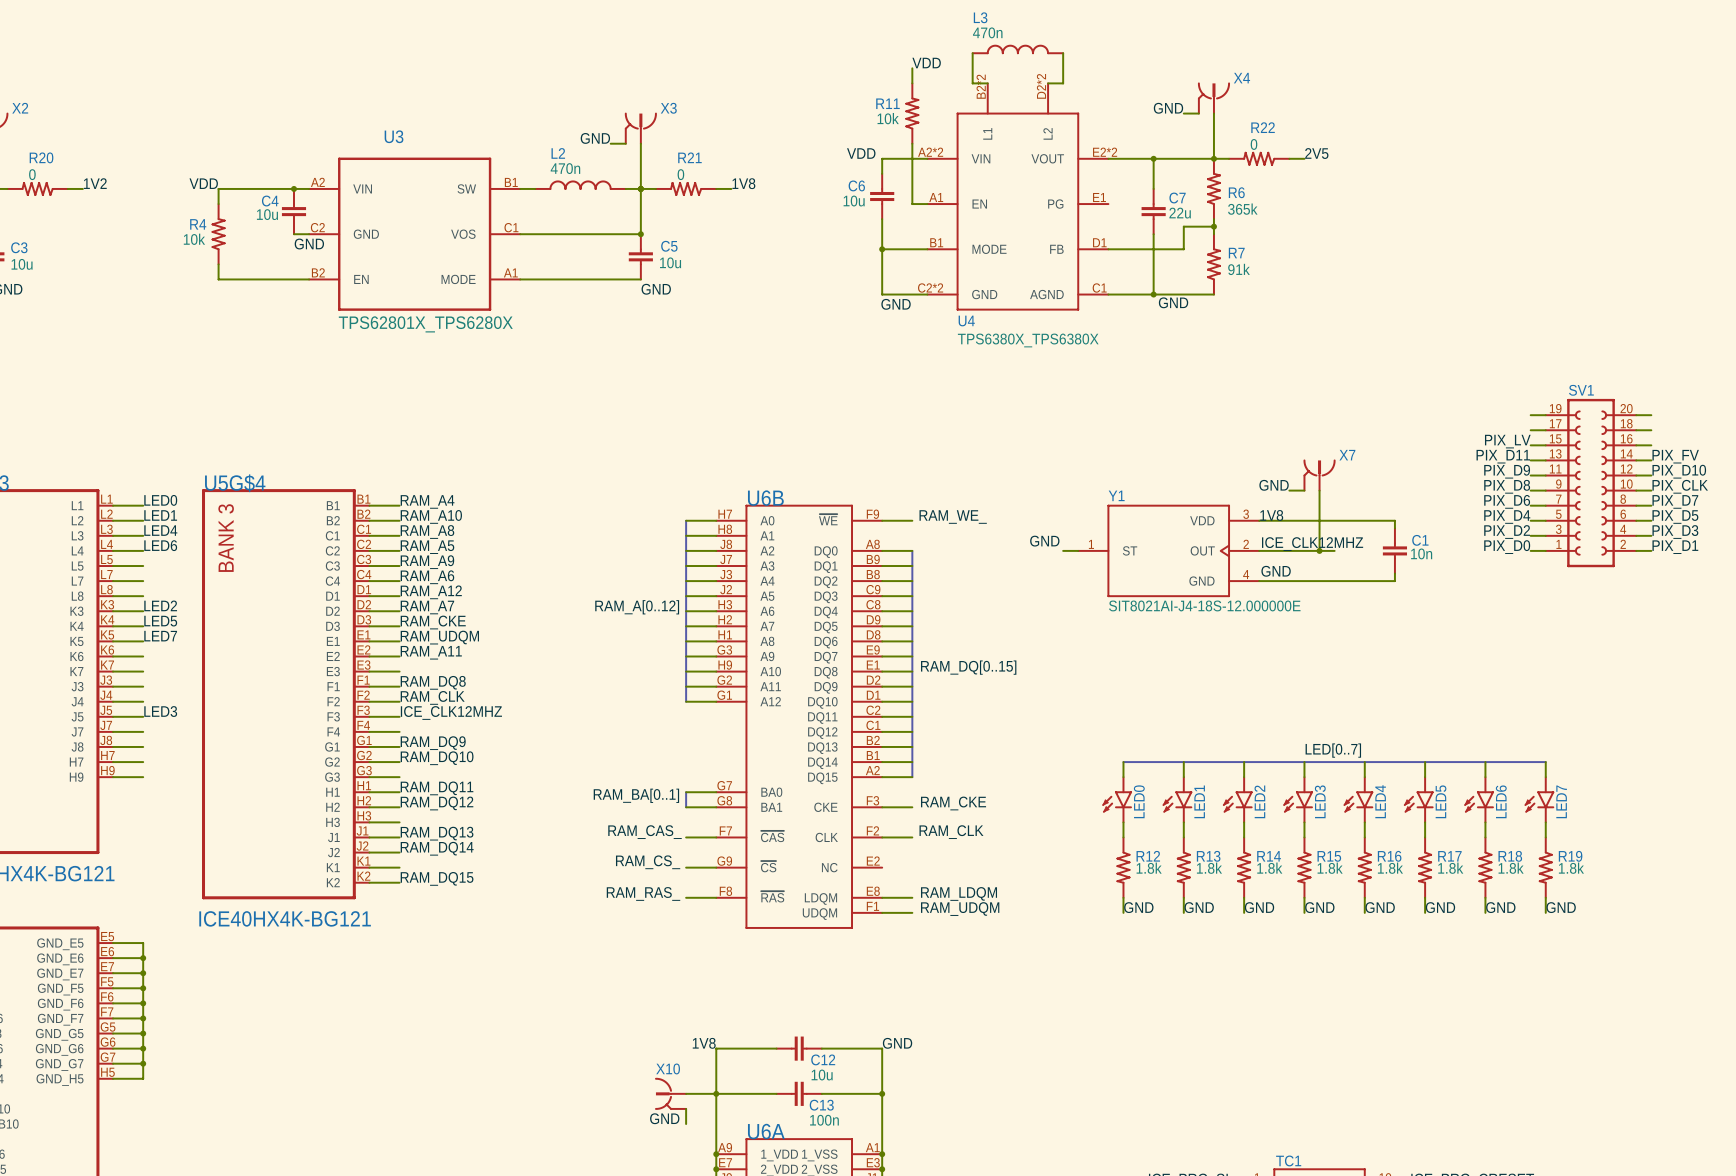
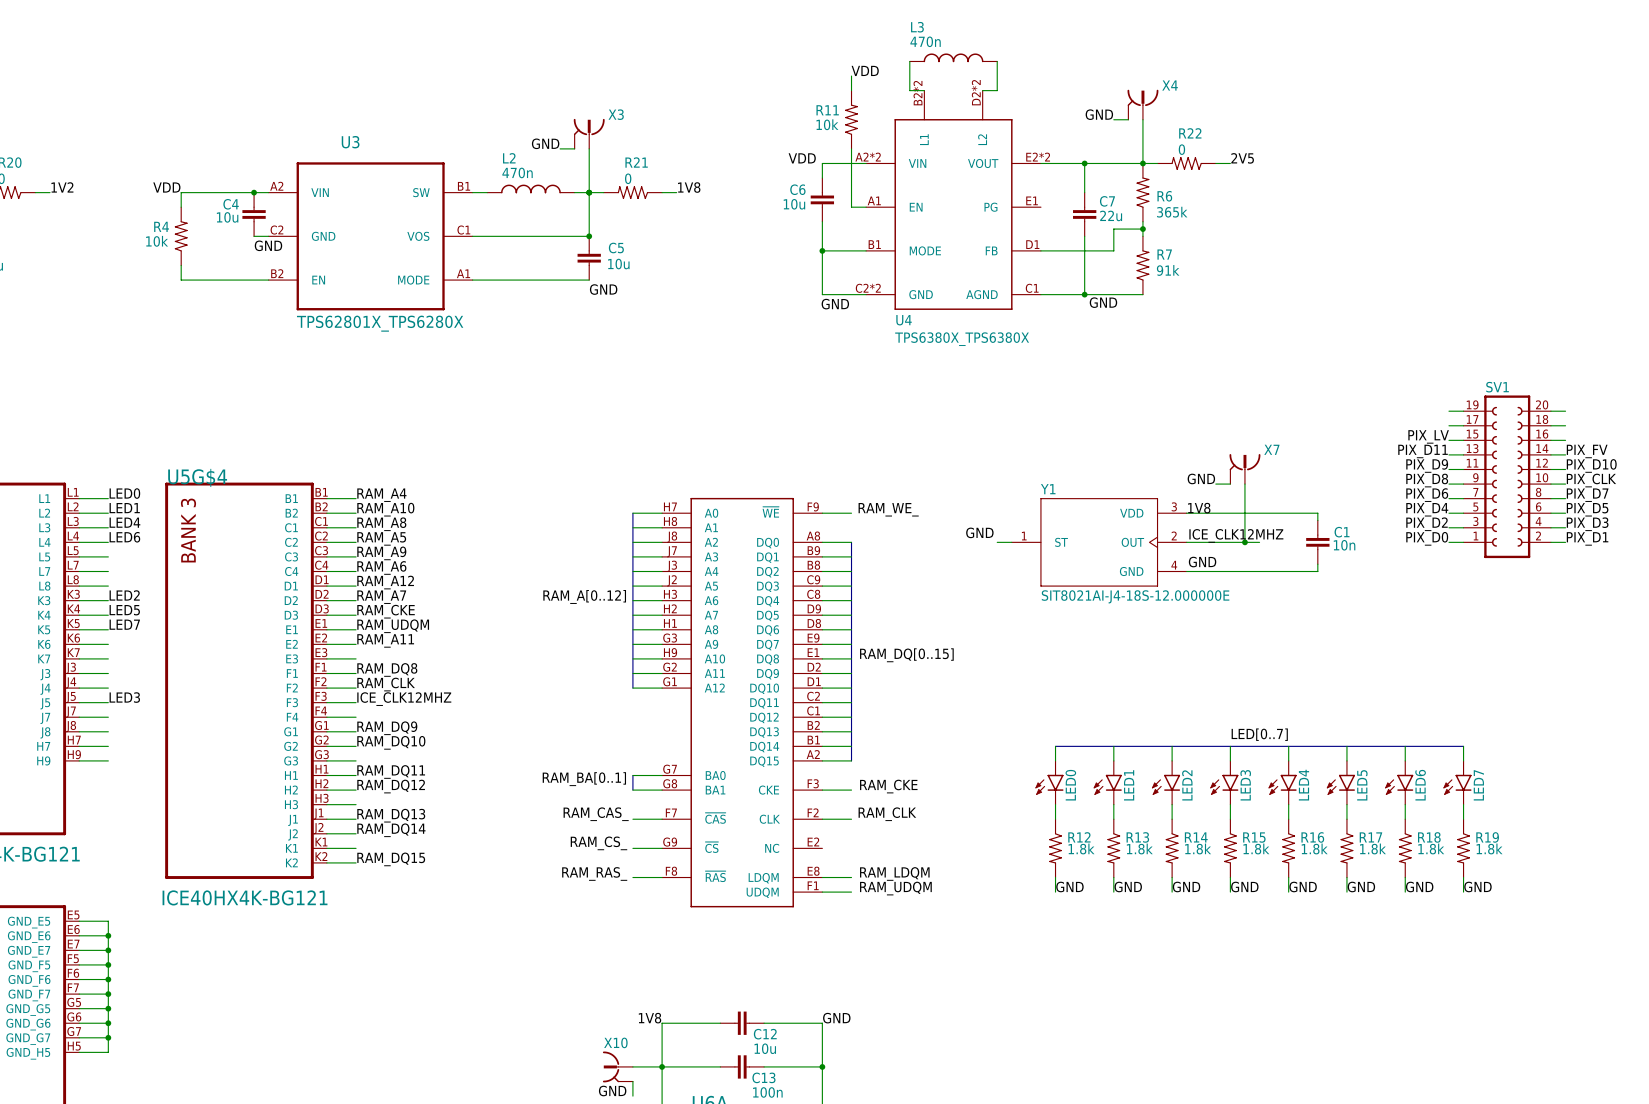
U6B name: U6B (765, 498) -> none

